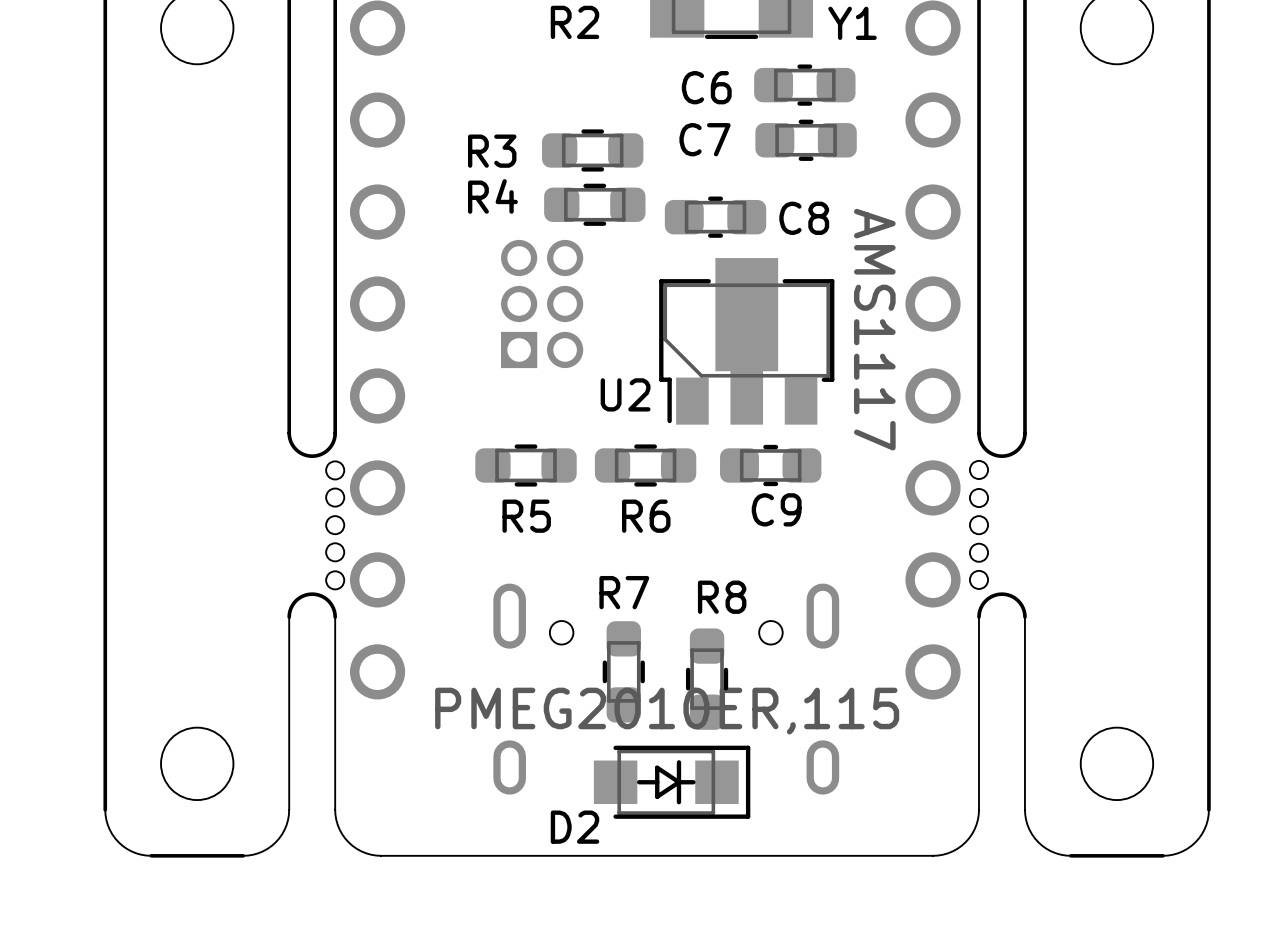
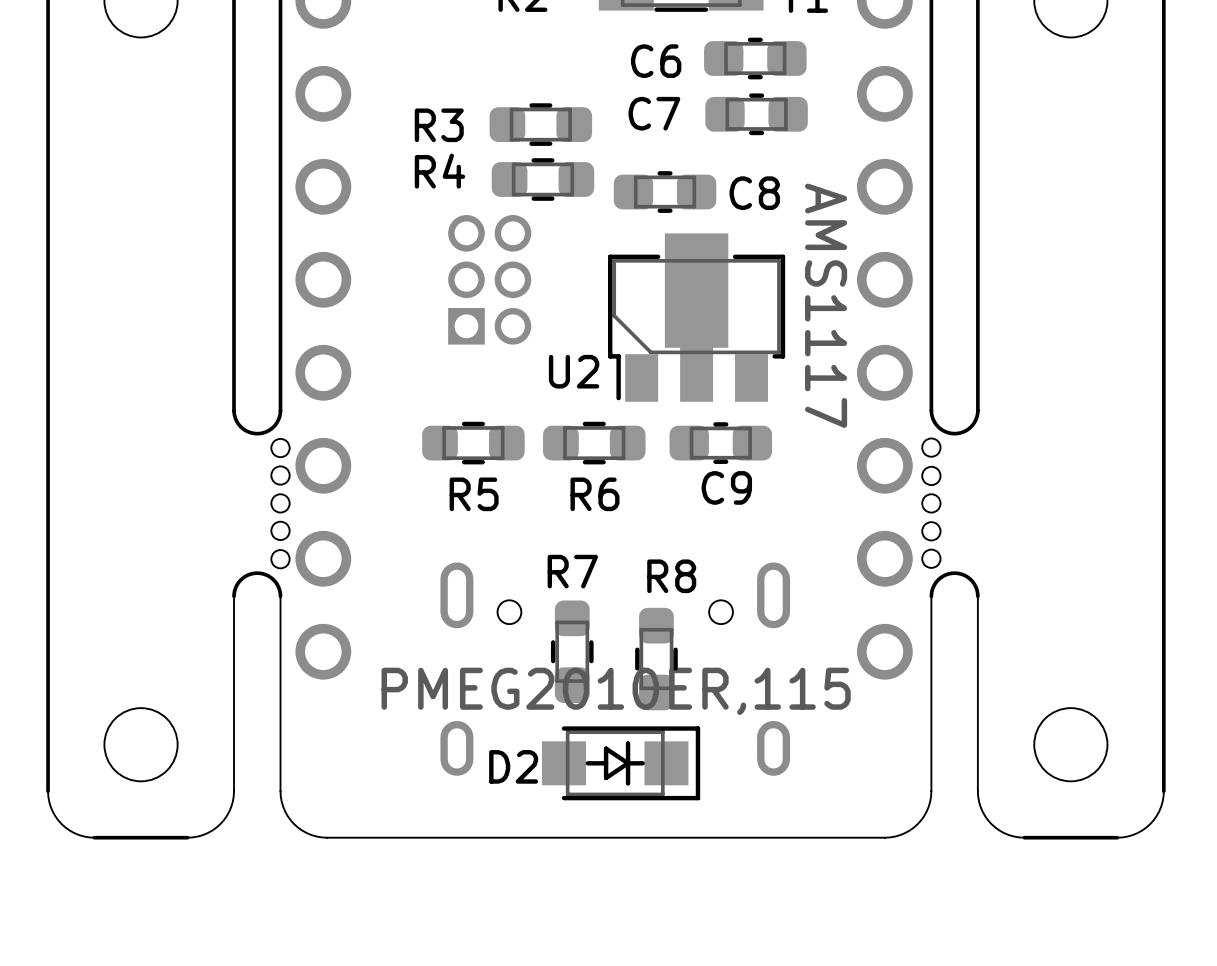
D2 name position: D2 (575, 827) -> D2 (513, 766)

